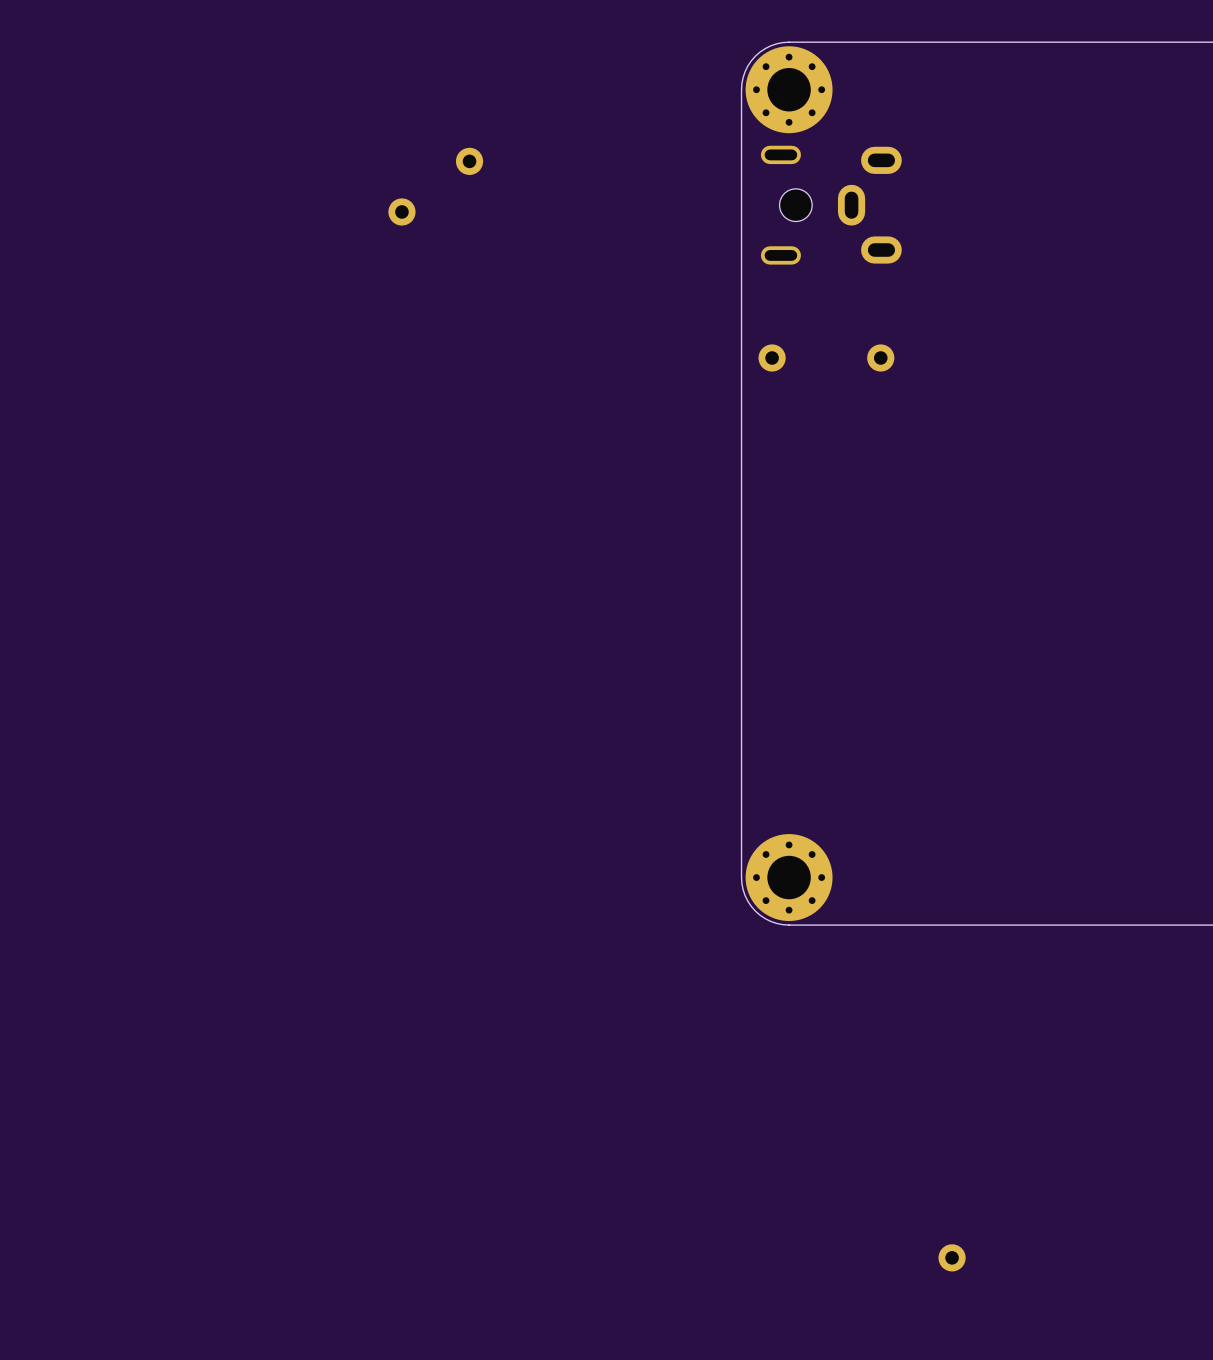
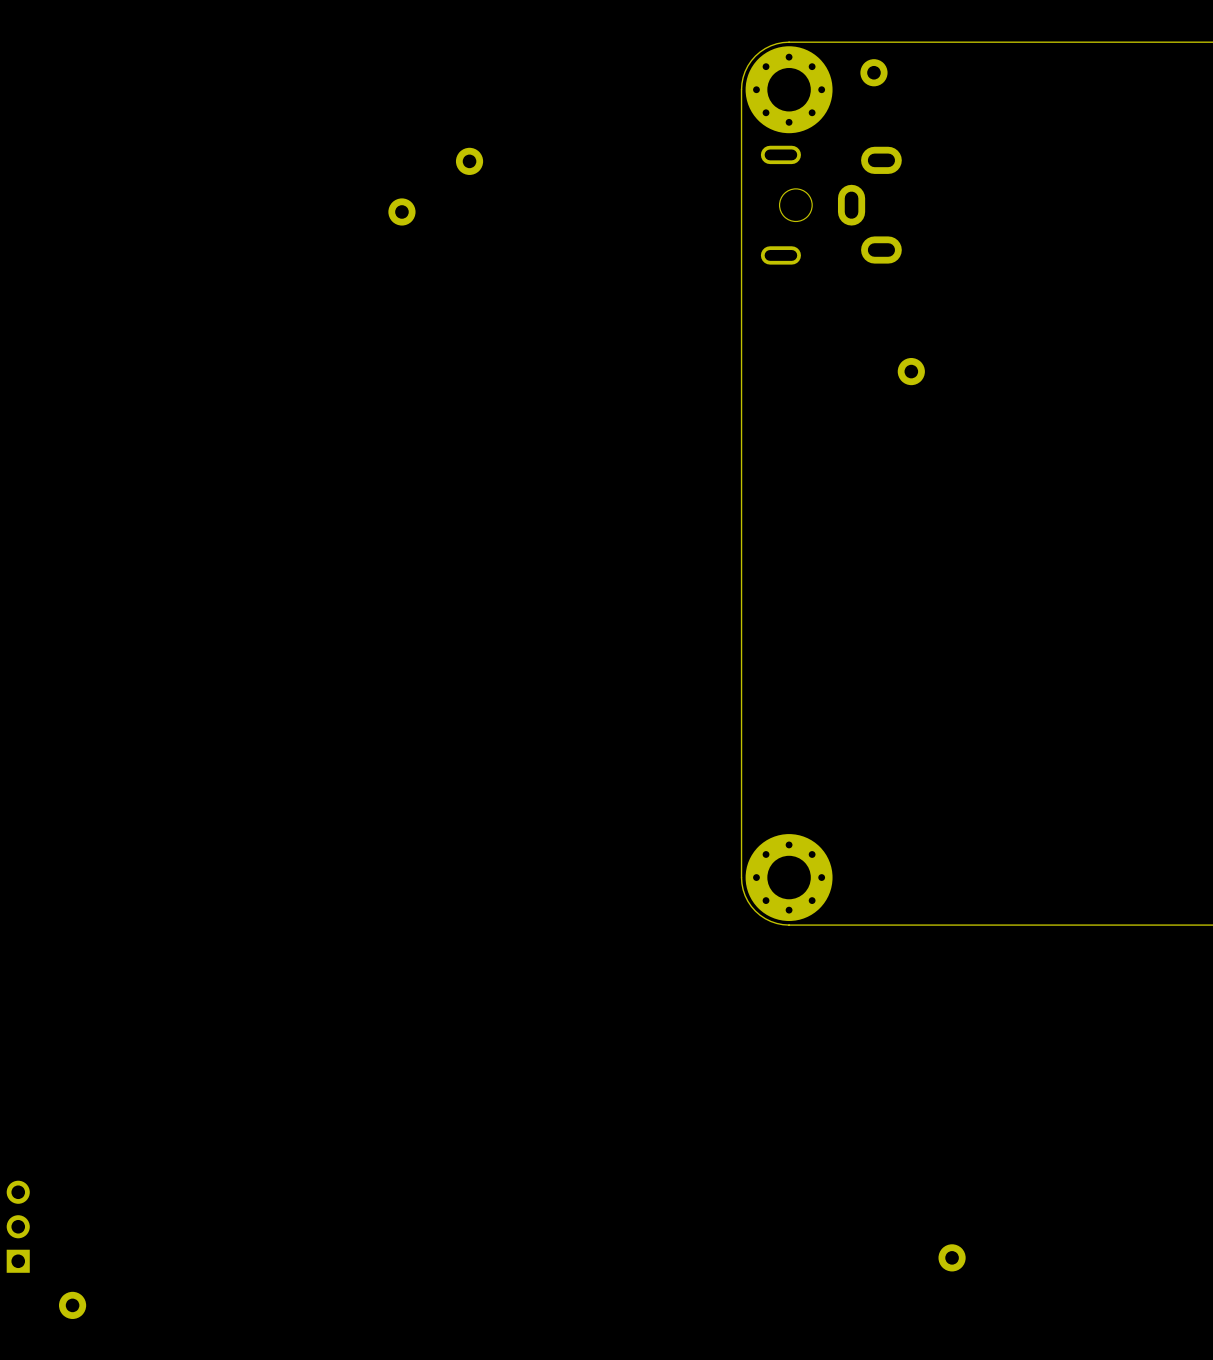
part: none -> (873, 72)
part: (772, 357) -> none
part position: (880, 357) -> (911, 371)
part: none -> (18, 1226)
part: none -> (72, 1305)

